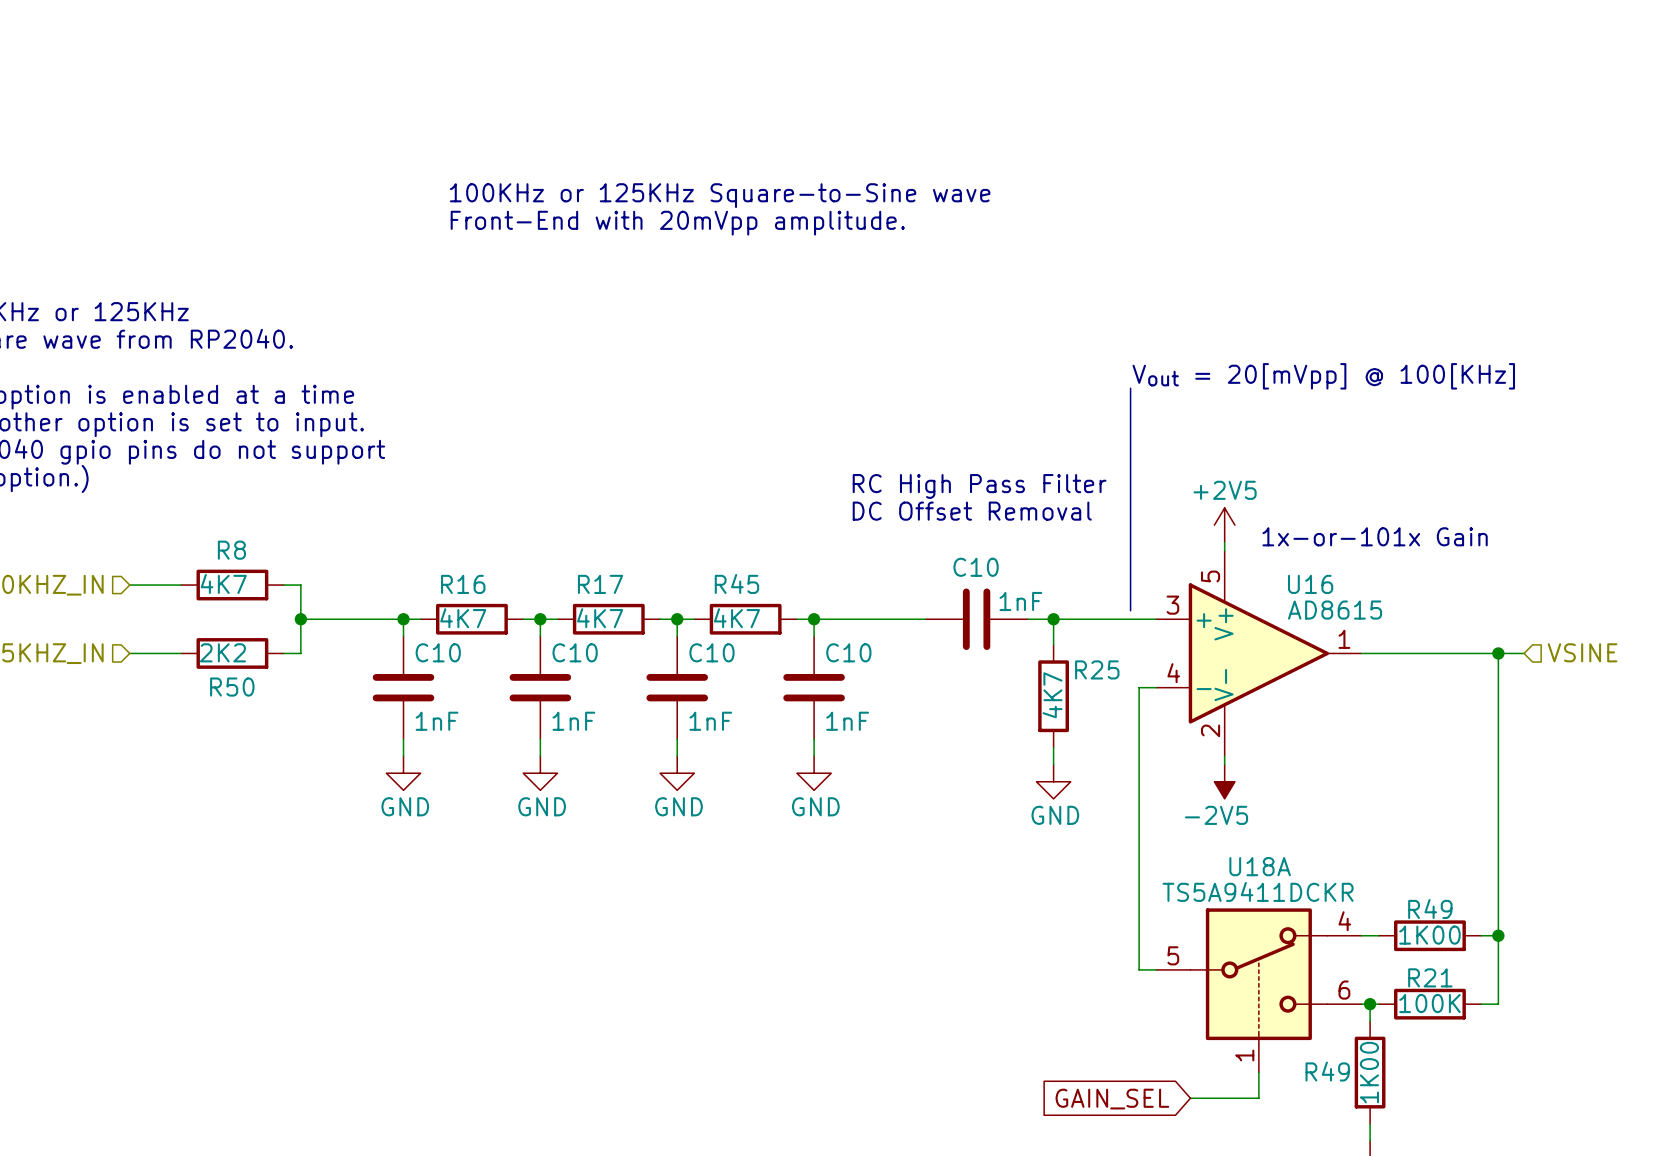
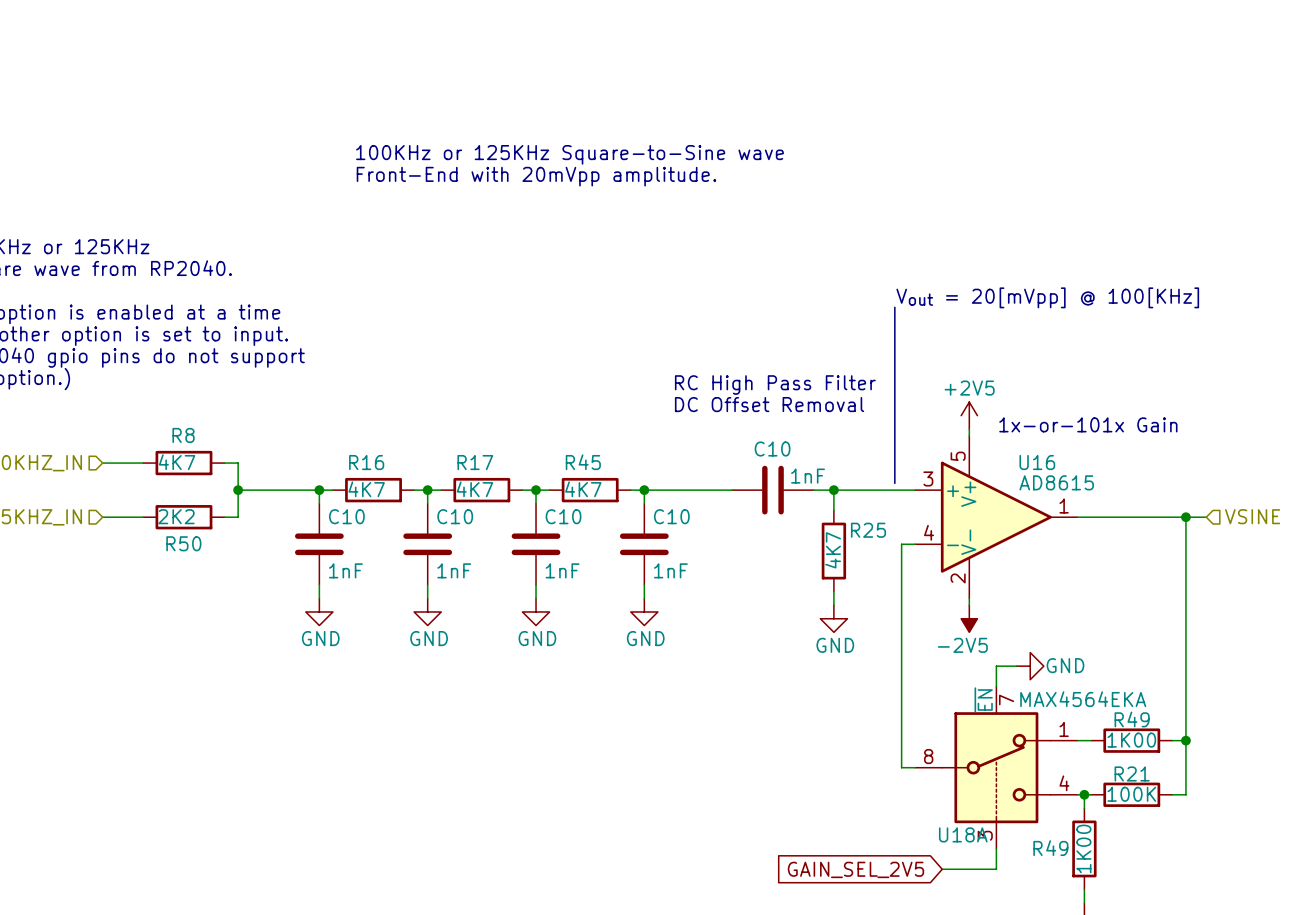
wire: none -> (1016, 666) (996, 666) (996, 686)
power symbol: none -> GND (1030, 666)
U18A name position: U18A (1260, 866) -> U18A (963, 834)
U18A value: TS5A9411DCKR (1258, 891) -> MAX4564EKA (1083, 699)
U18A symbol: [1156, 908, 1362, 1073] -> [915, 686, 1078, 849]
global label: GAIN_SEL (1112, 1099) -> GAIN_SEL_2V5 (855, 869)

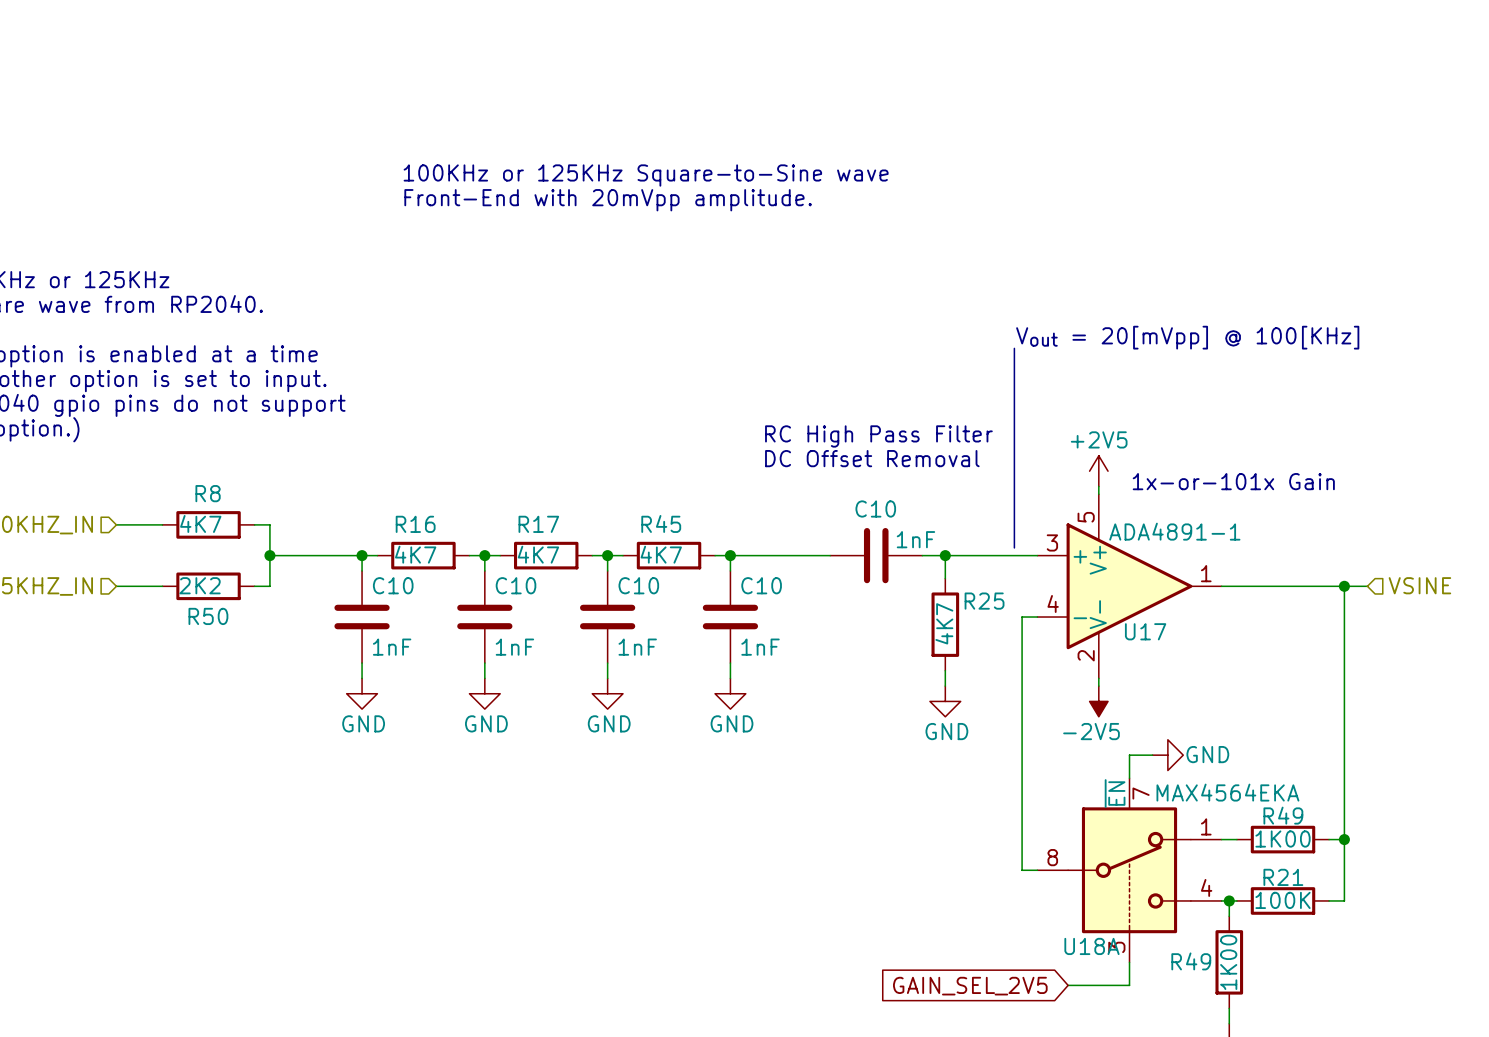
U16 name: U16 (1037, 462) -> U17 (1145, 631)
U16 value: AD8615 (1056, 482) -> ADA4891-1 (1174, 531)

